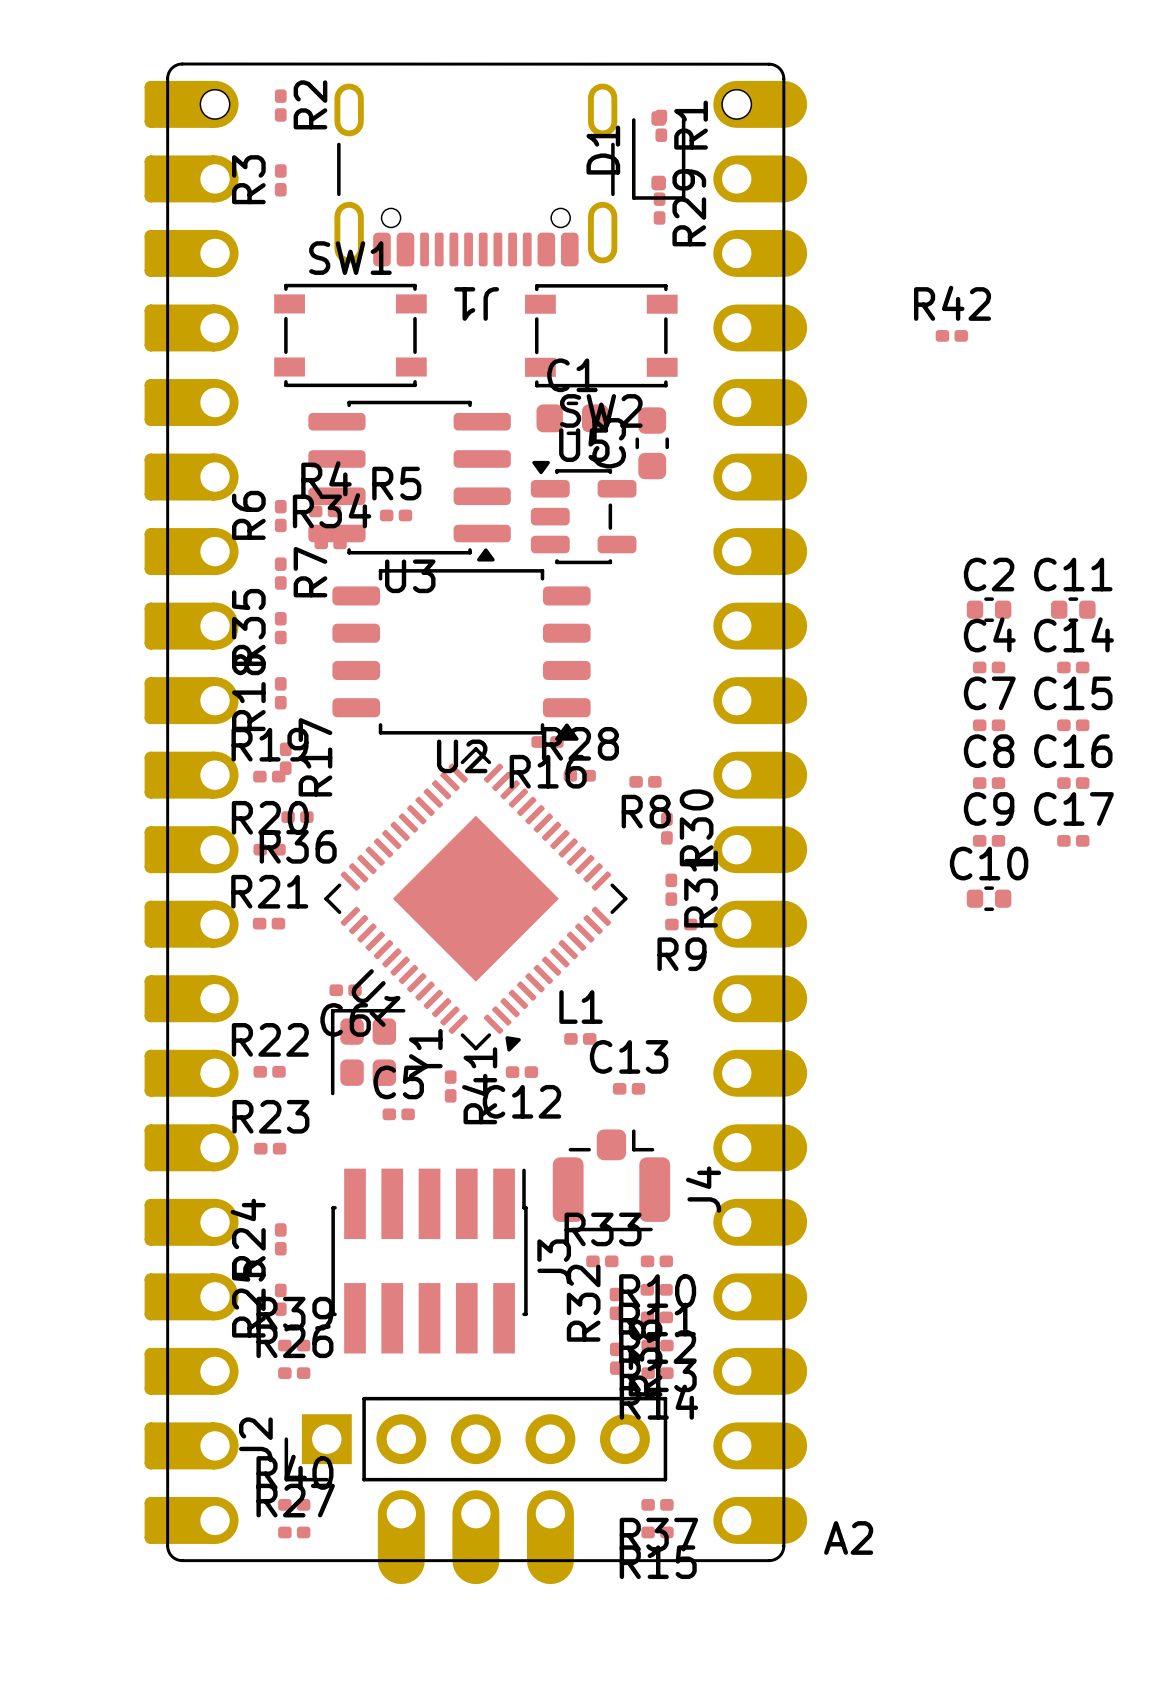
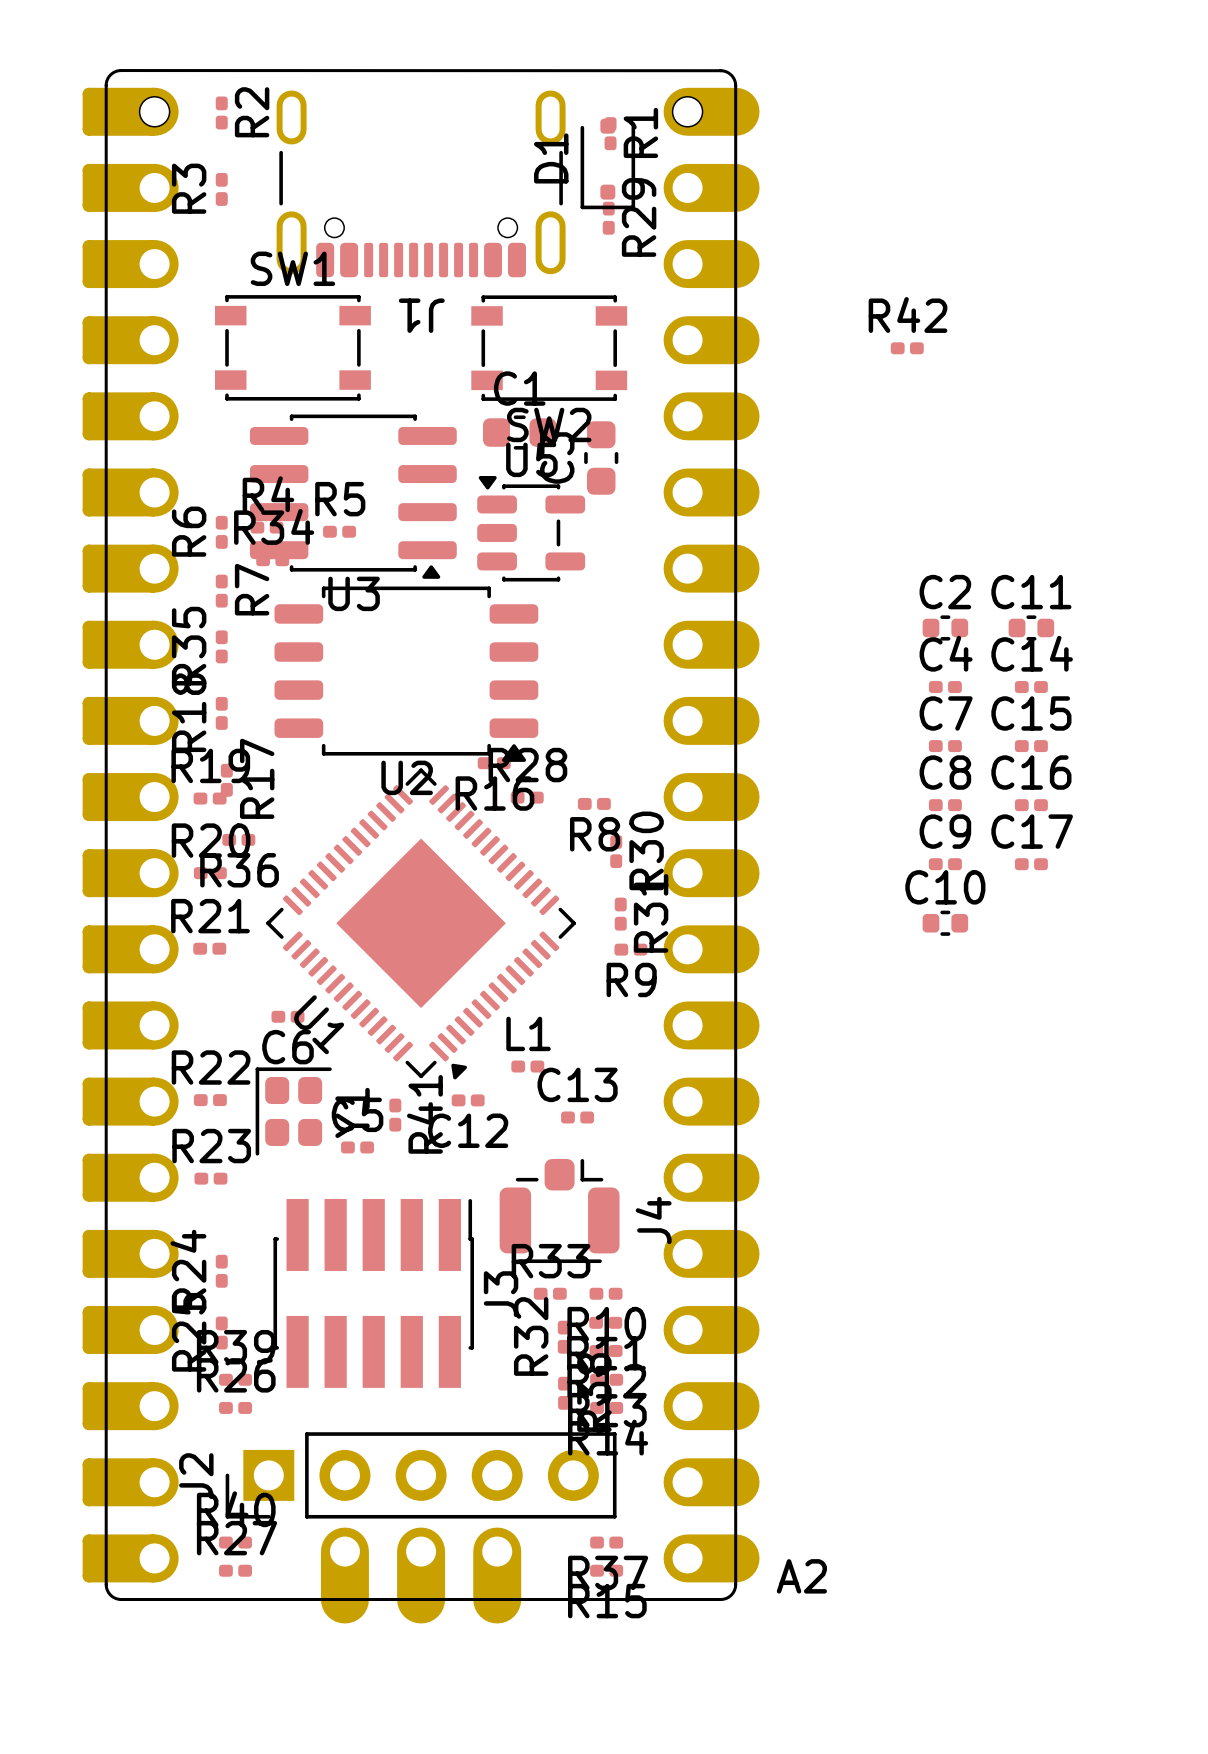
Y1 position: (368, 1052) -> (293, 1111)
C5 position: (398, 1114) -> (357, 1147)

